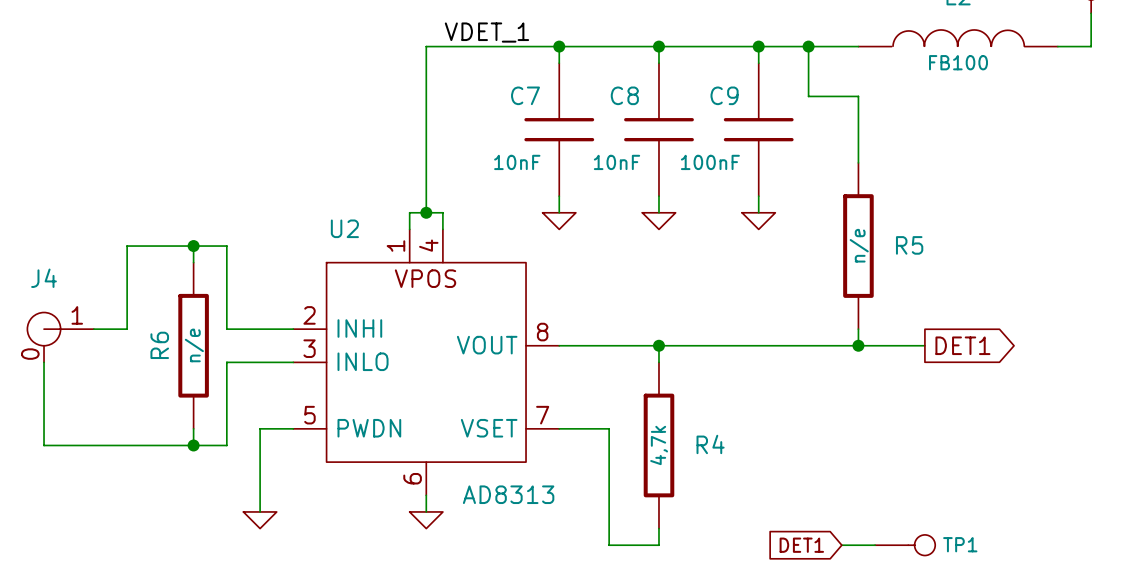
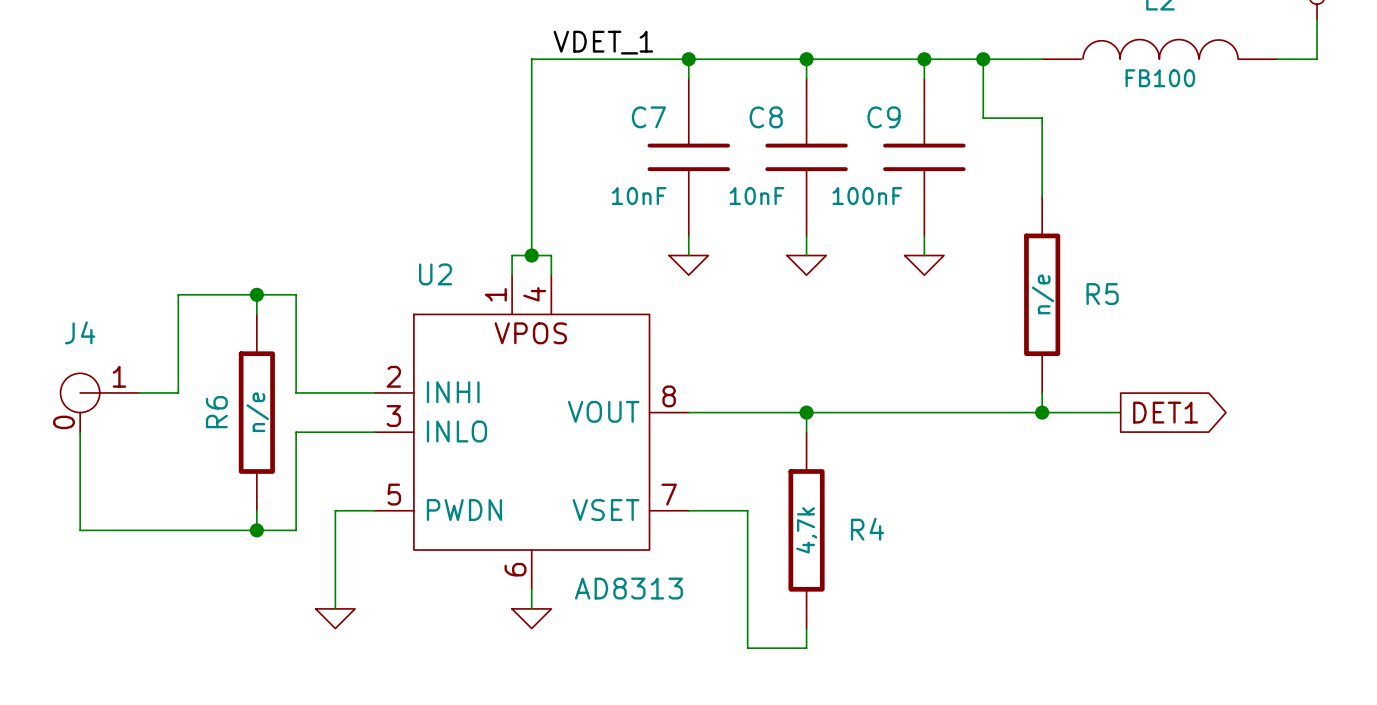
global label: DET1 (801, 545) -> none
wire: (841, 545) (875, 545) -> none
TP1: (905, 545) -> none

